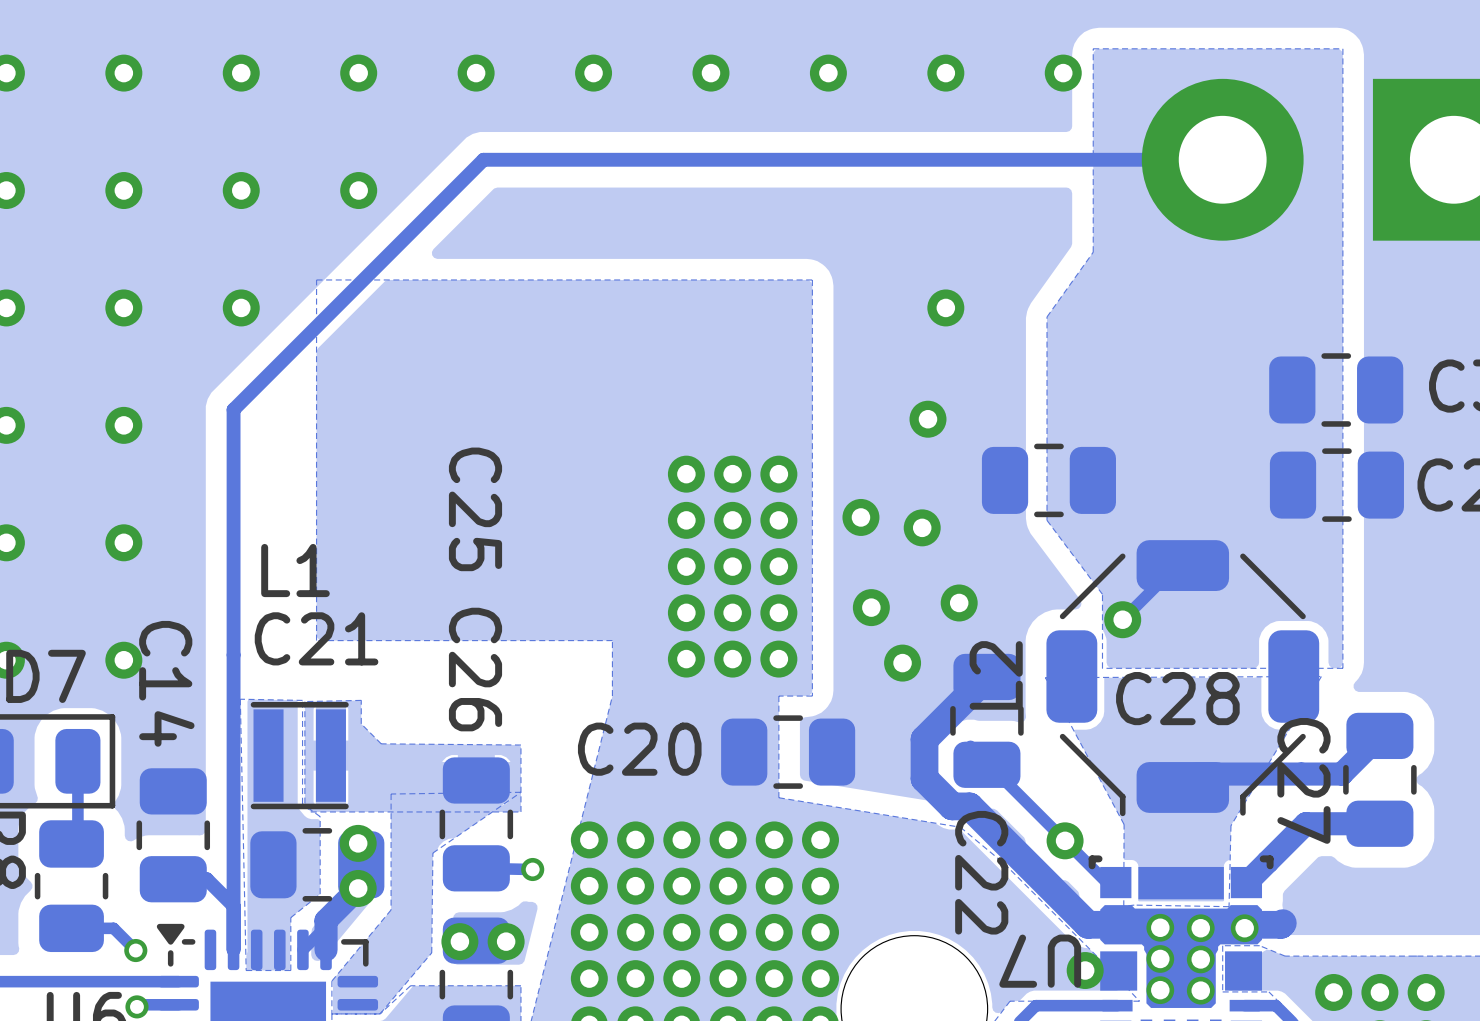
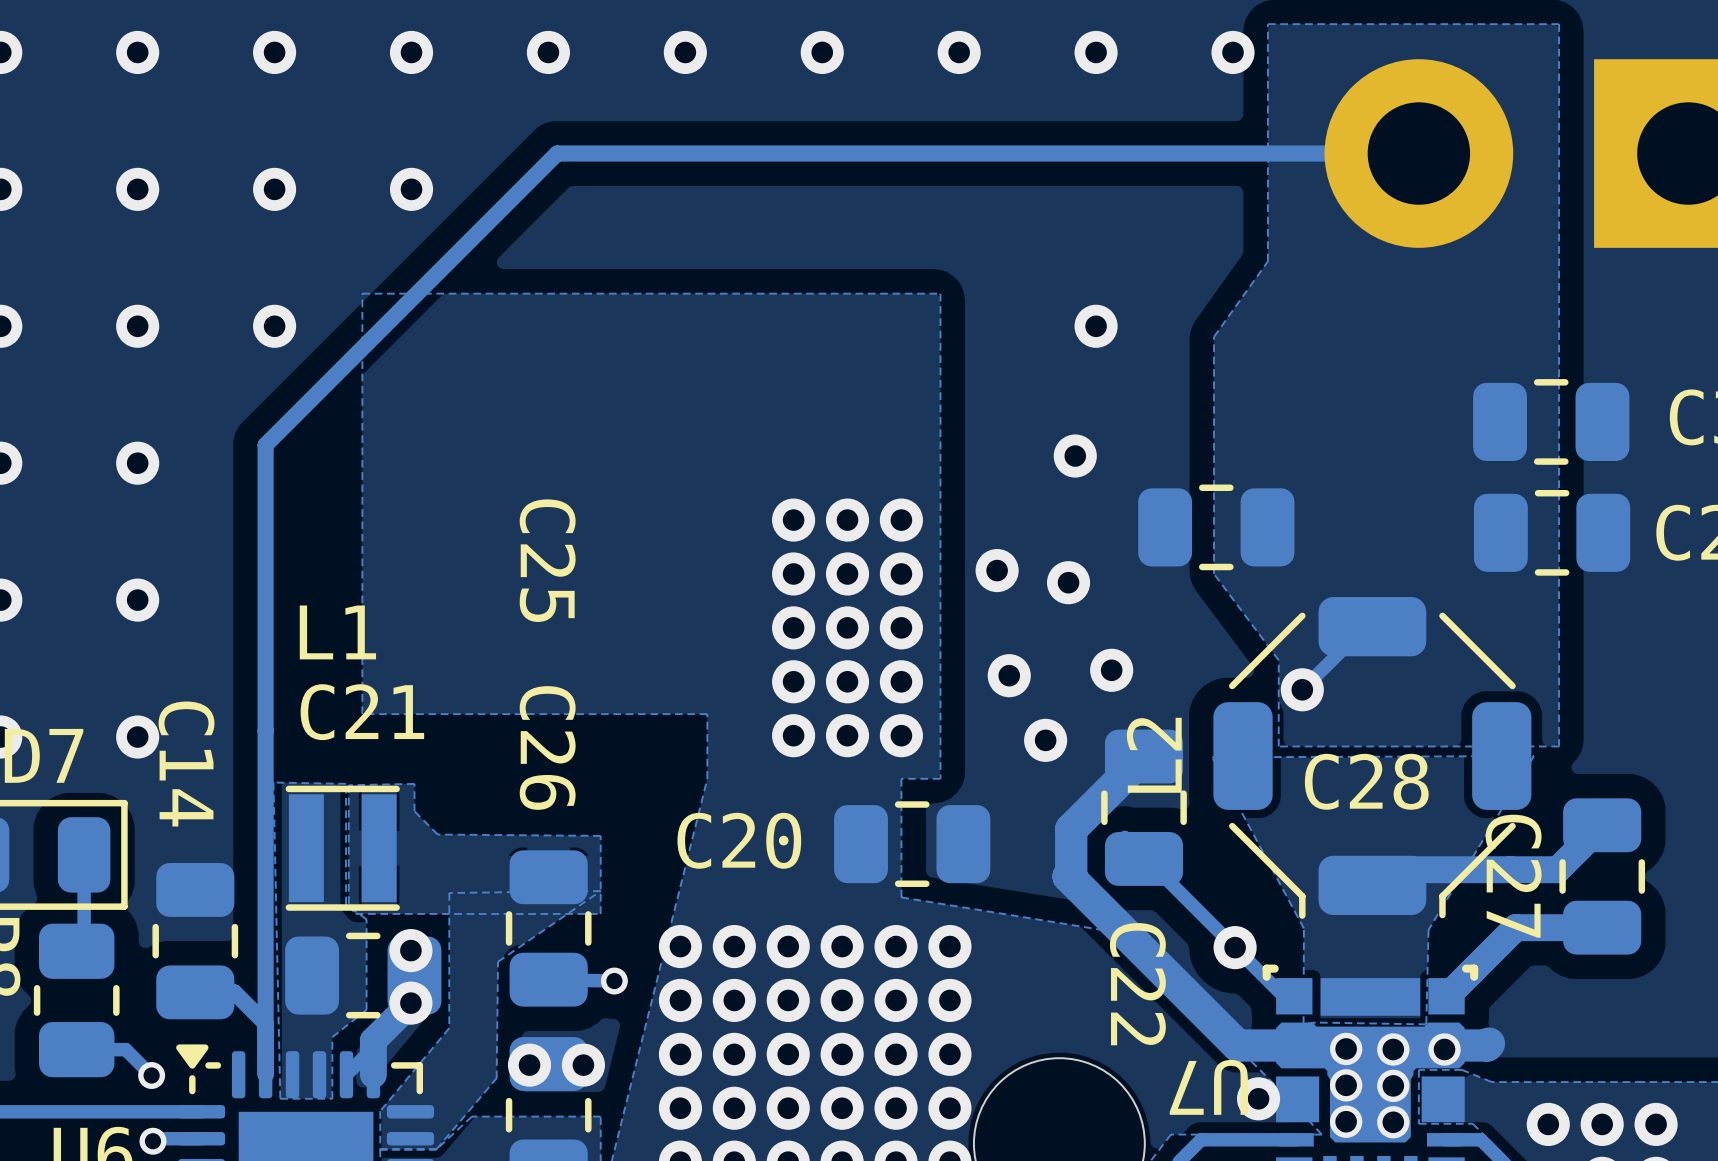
track: (924, 778) (952, 806) (969, 806) (1088, 924) -> (1071, 875) (1068, 876) (1237, 1045) (1261, 1045)

